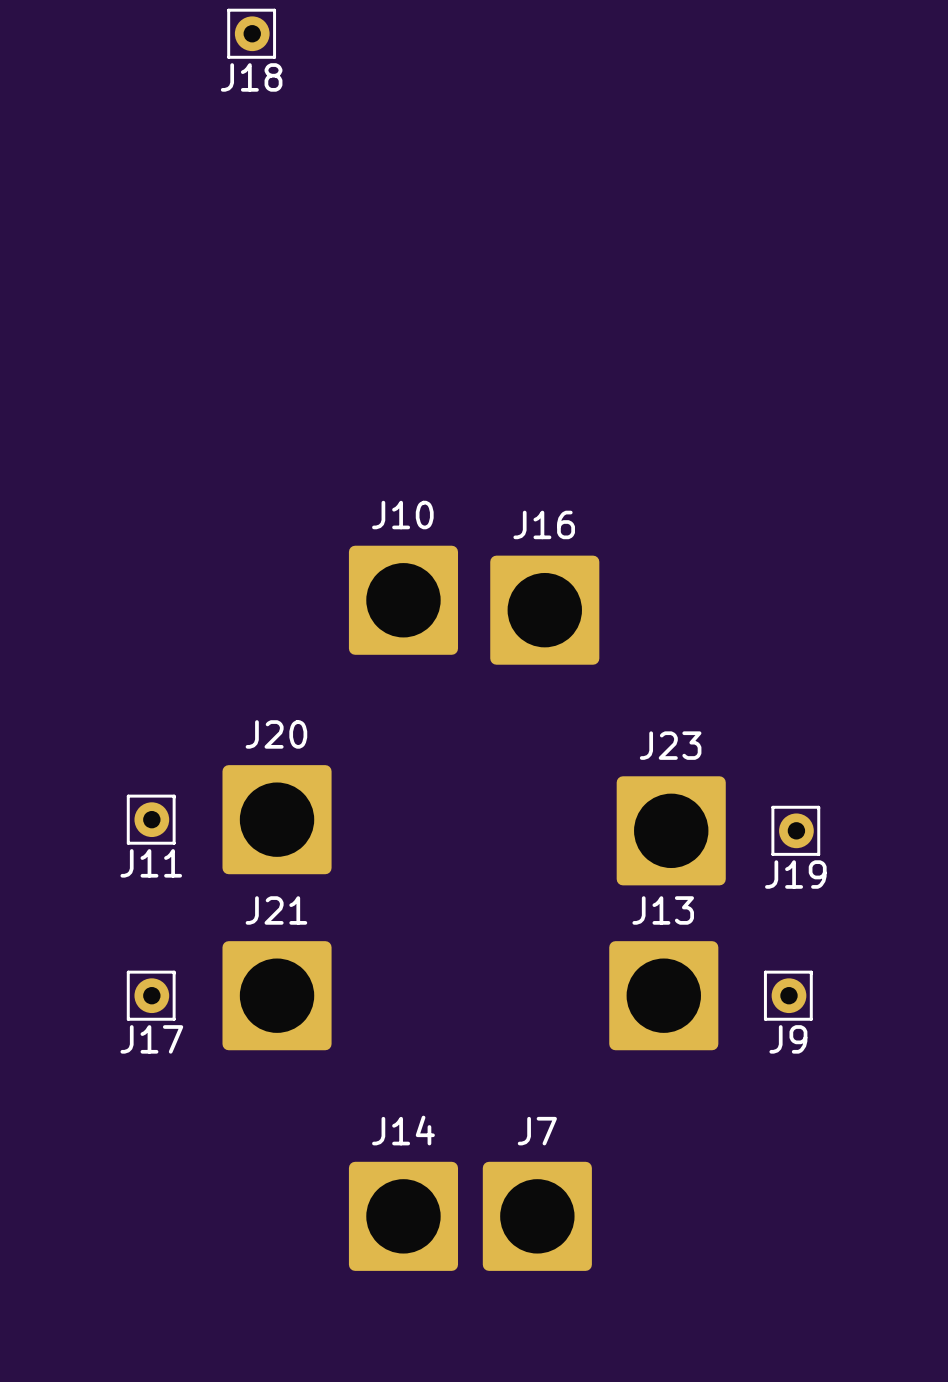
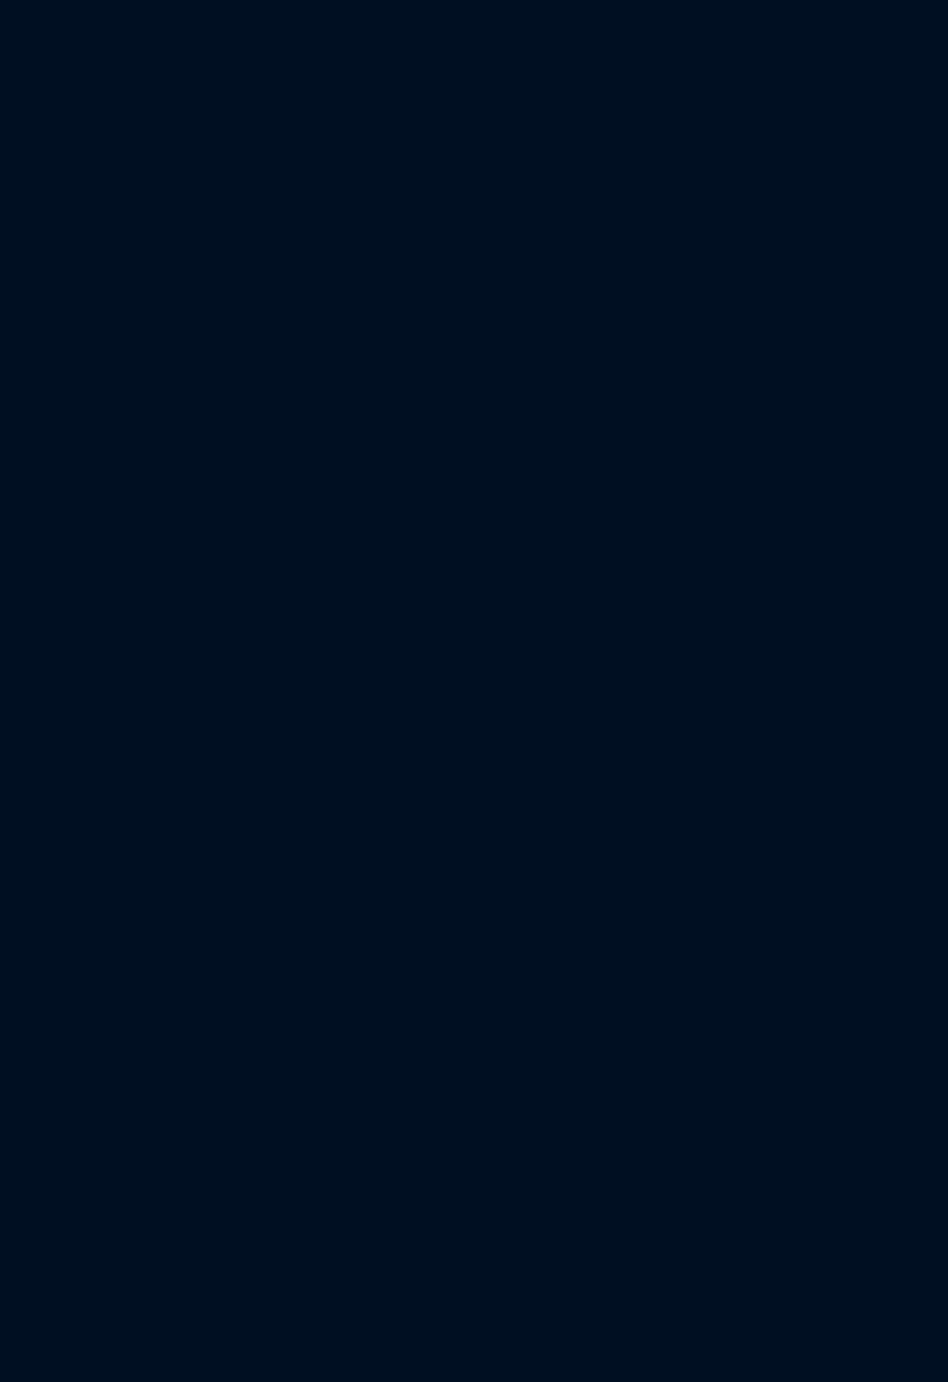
J18: (251, 33) -> none
J10: (403, 600) -> none
J16: (544, 610) -> none
J11: (151, 819) -> none
J20: (277, 819) -> none
J23: (671, 830) -> none
J19: (795, 830) -> none
J17: (151, 995) -> none
J21: (277, 995) -> none
J13: (663, 995) -> none
J9: (788, 995) -> none
J14: (403, 1216) -> none
J7: (537, 1216) -> none

